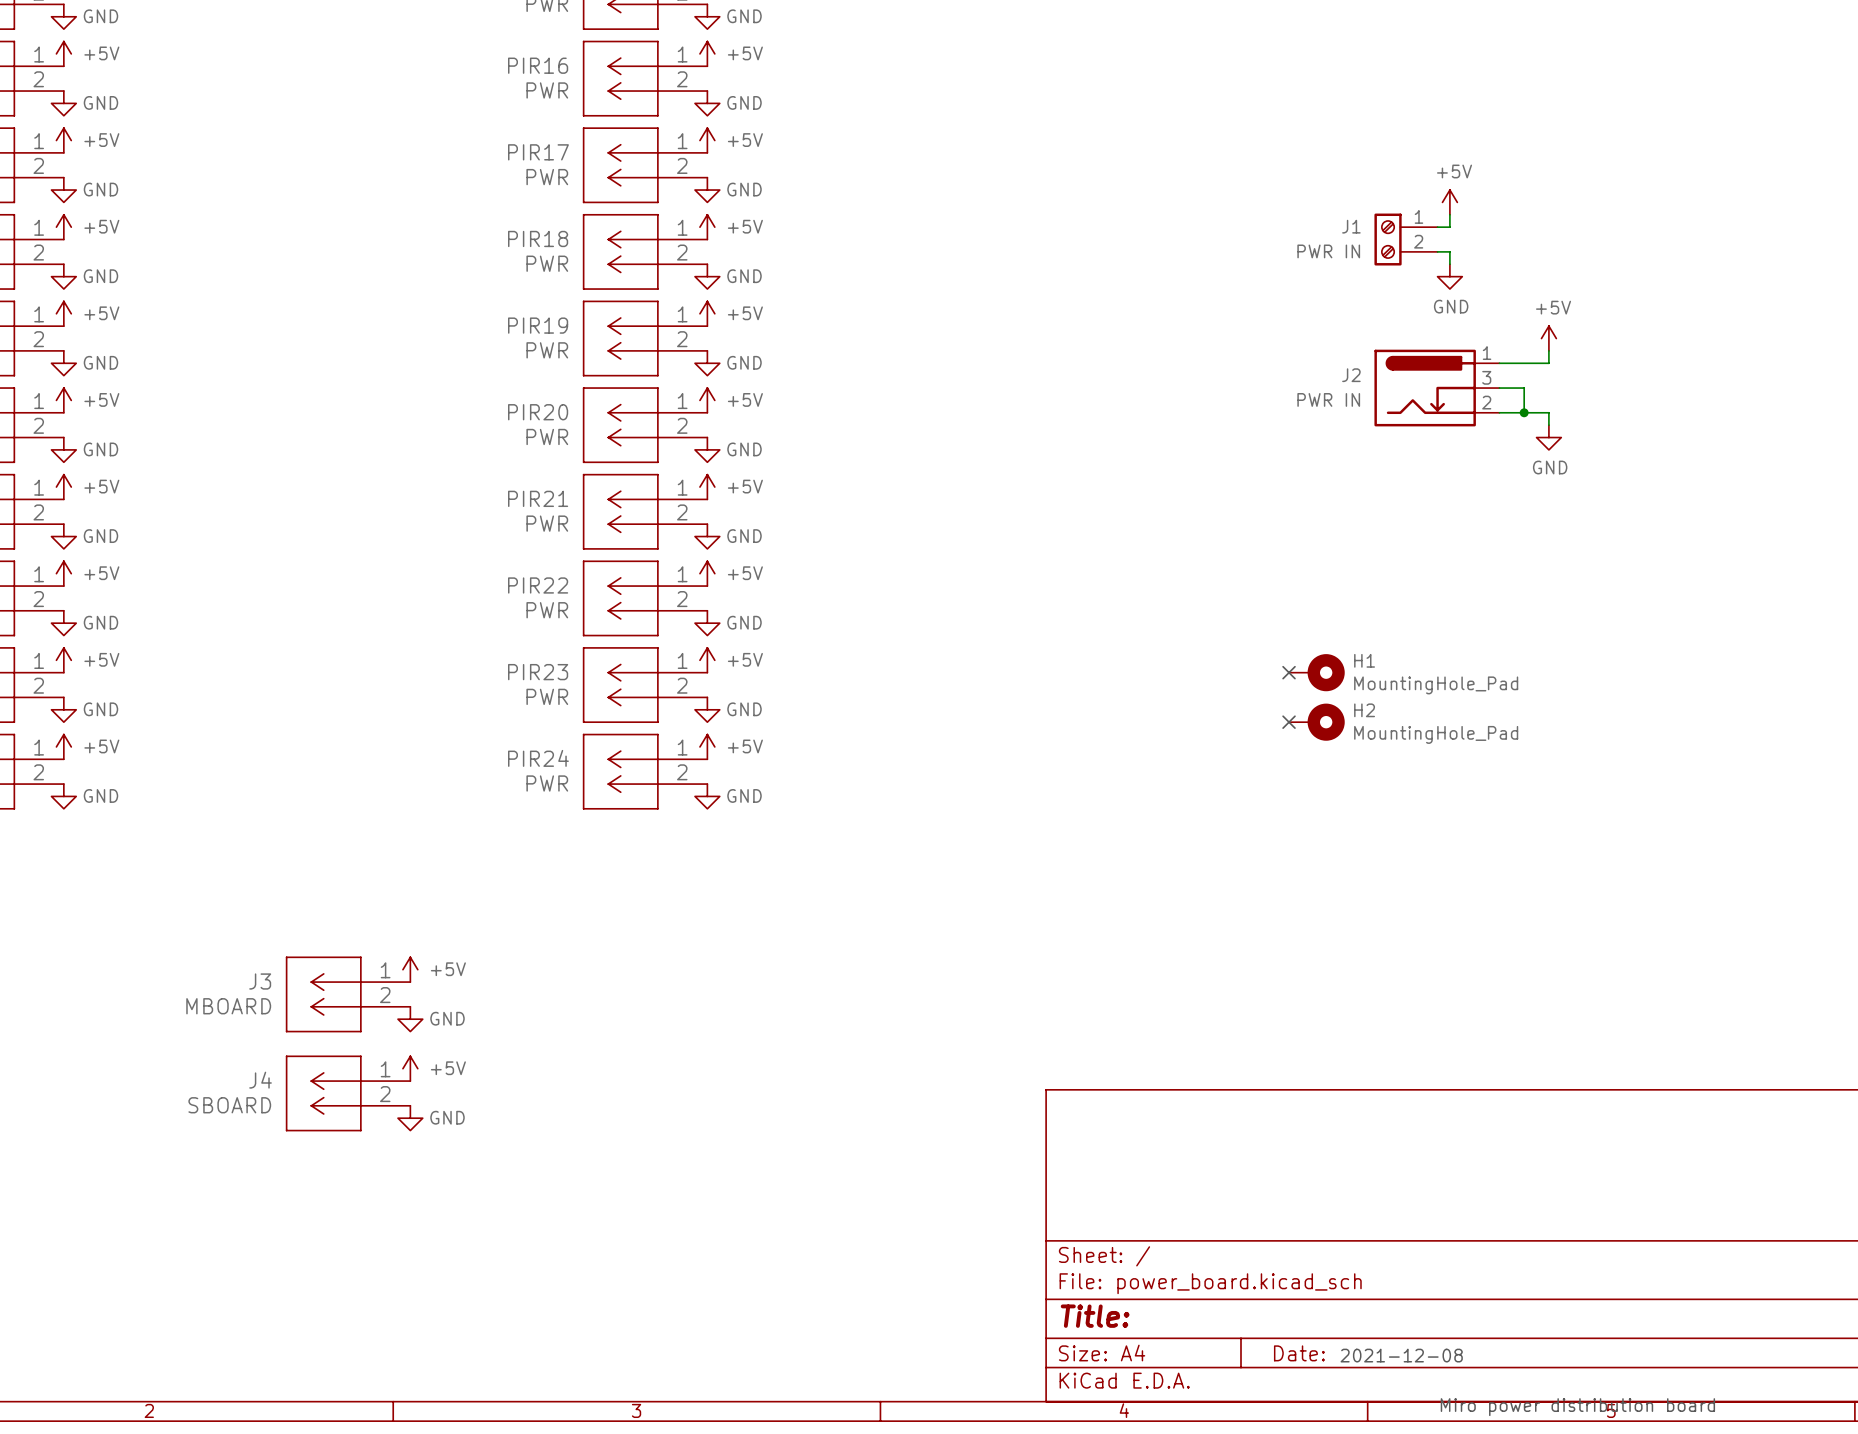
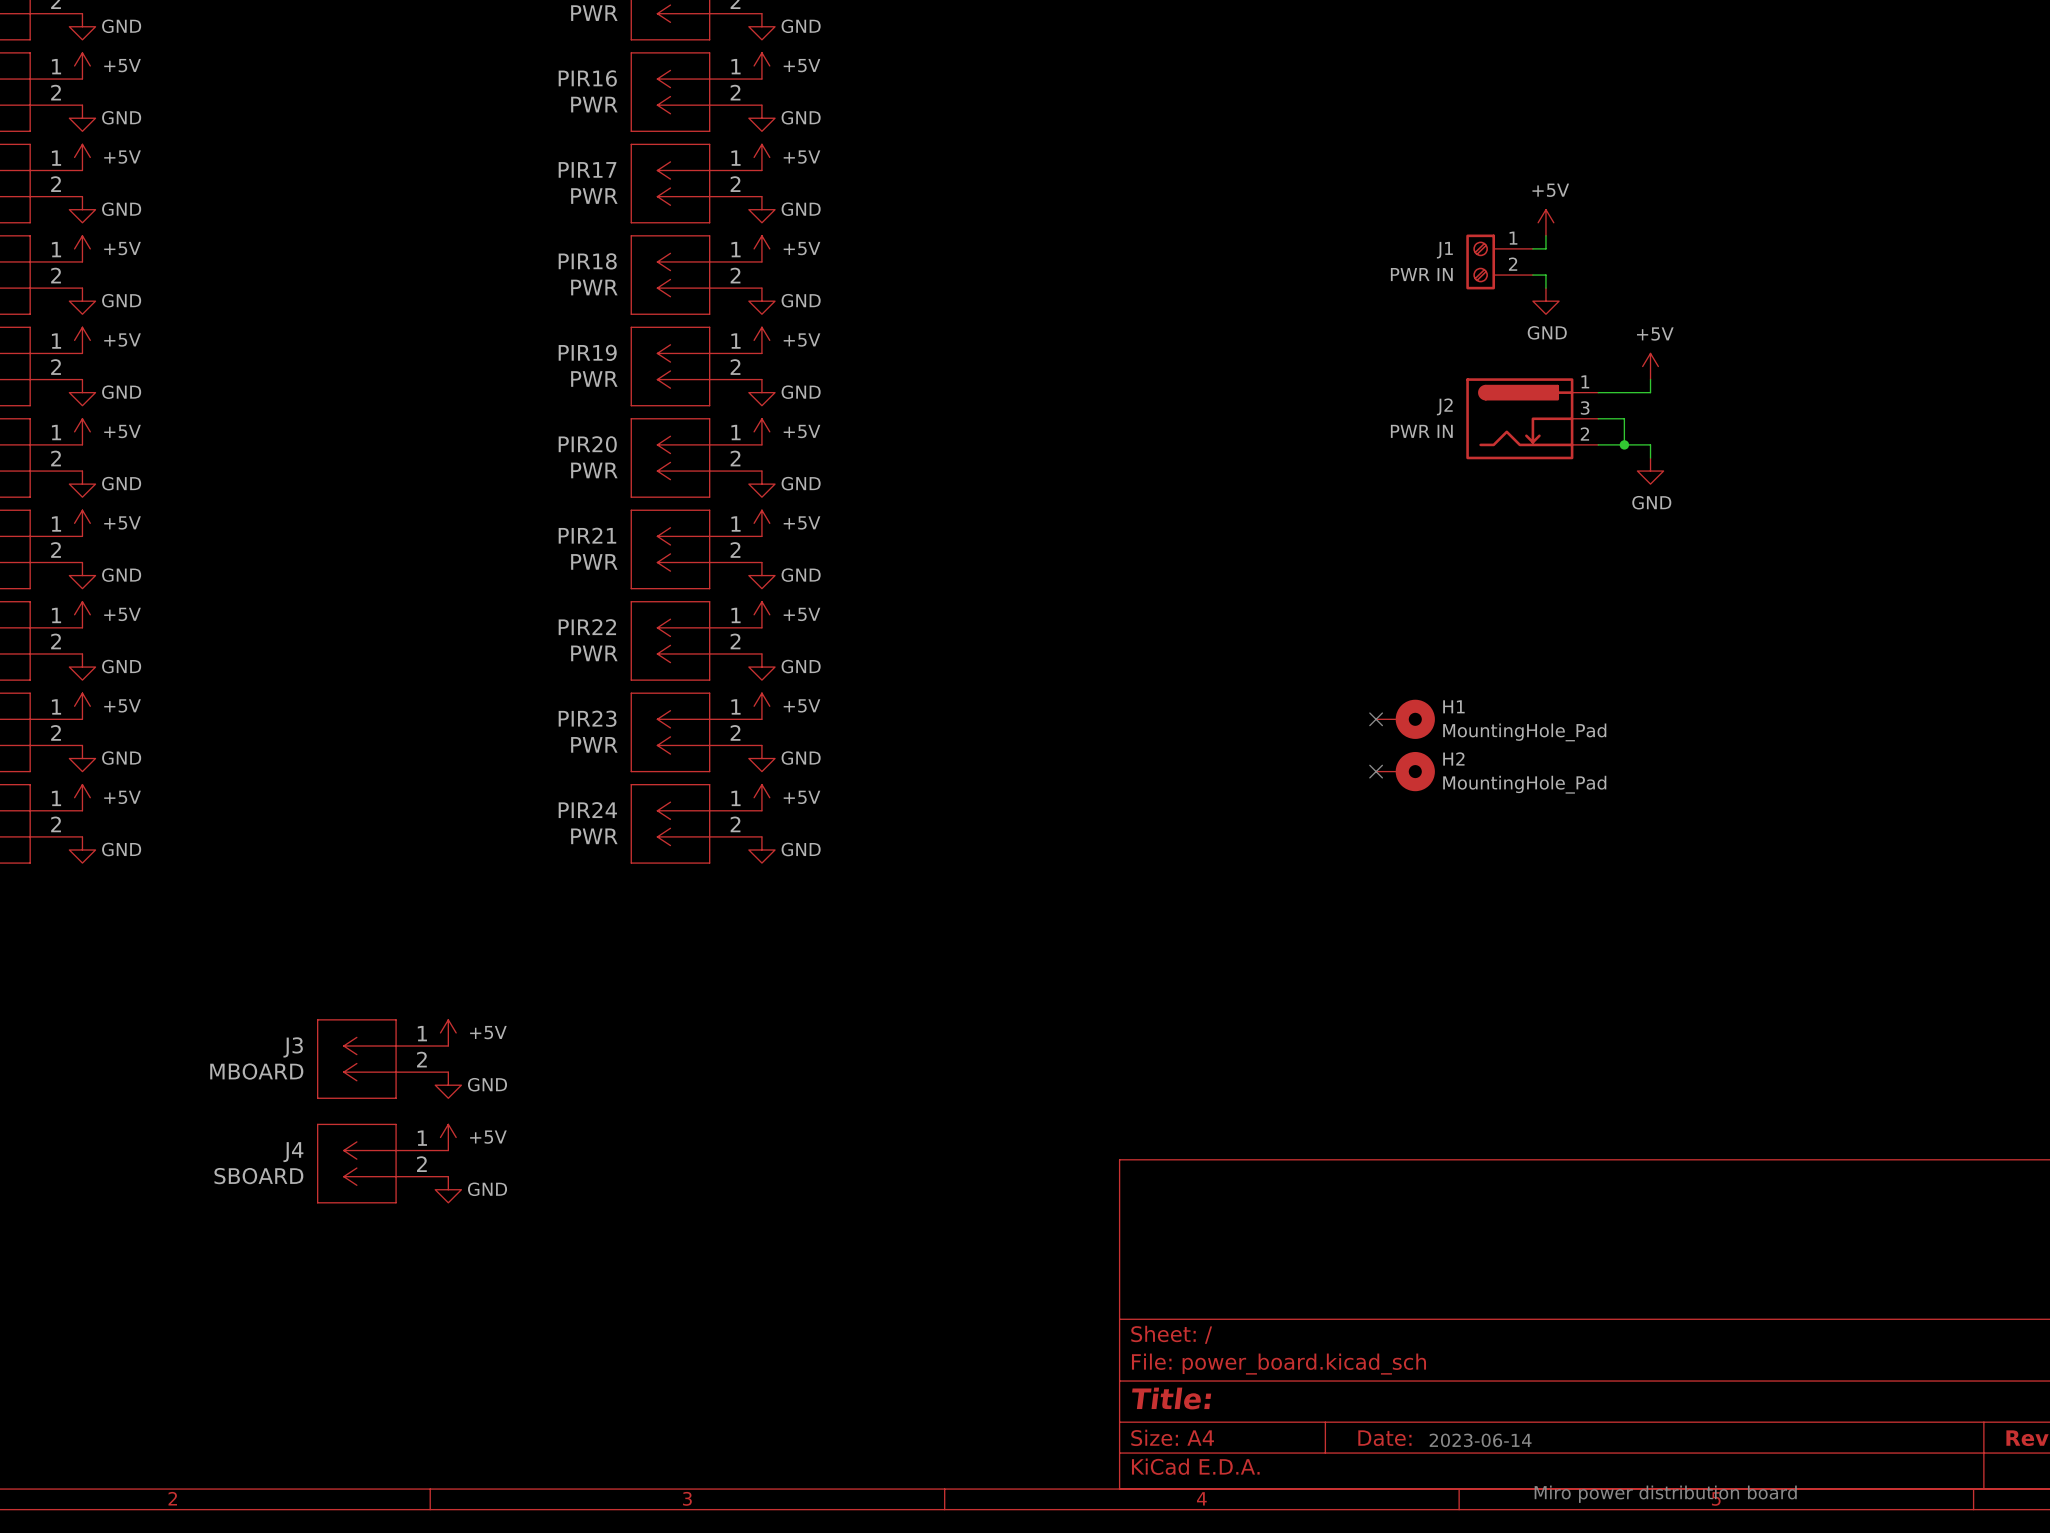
text: 2021-12-08 (1401, 1355) -> 2023-06-14 (1480, 1440)

